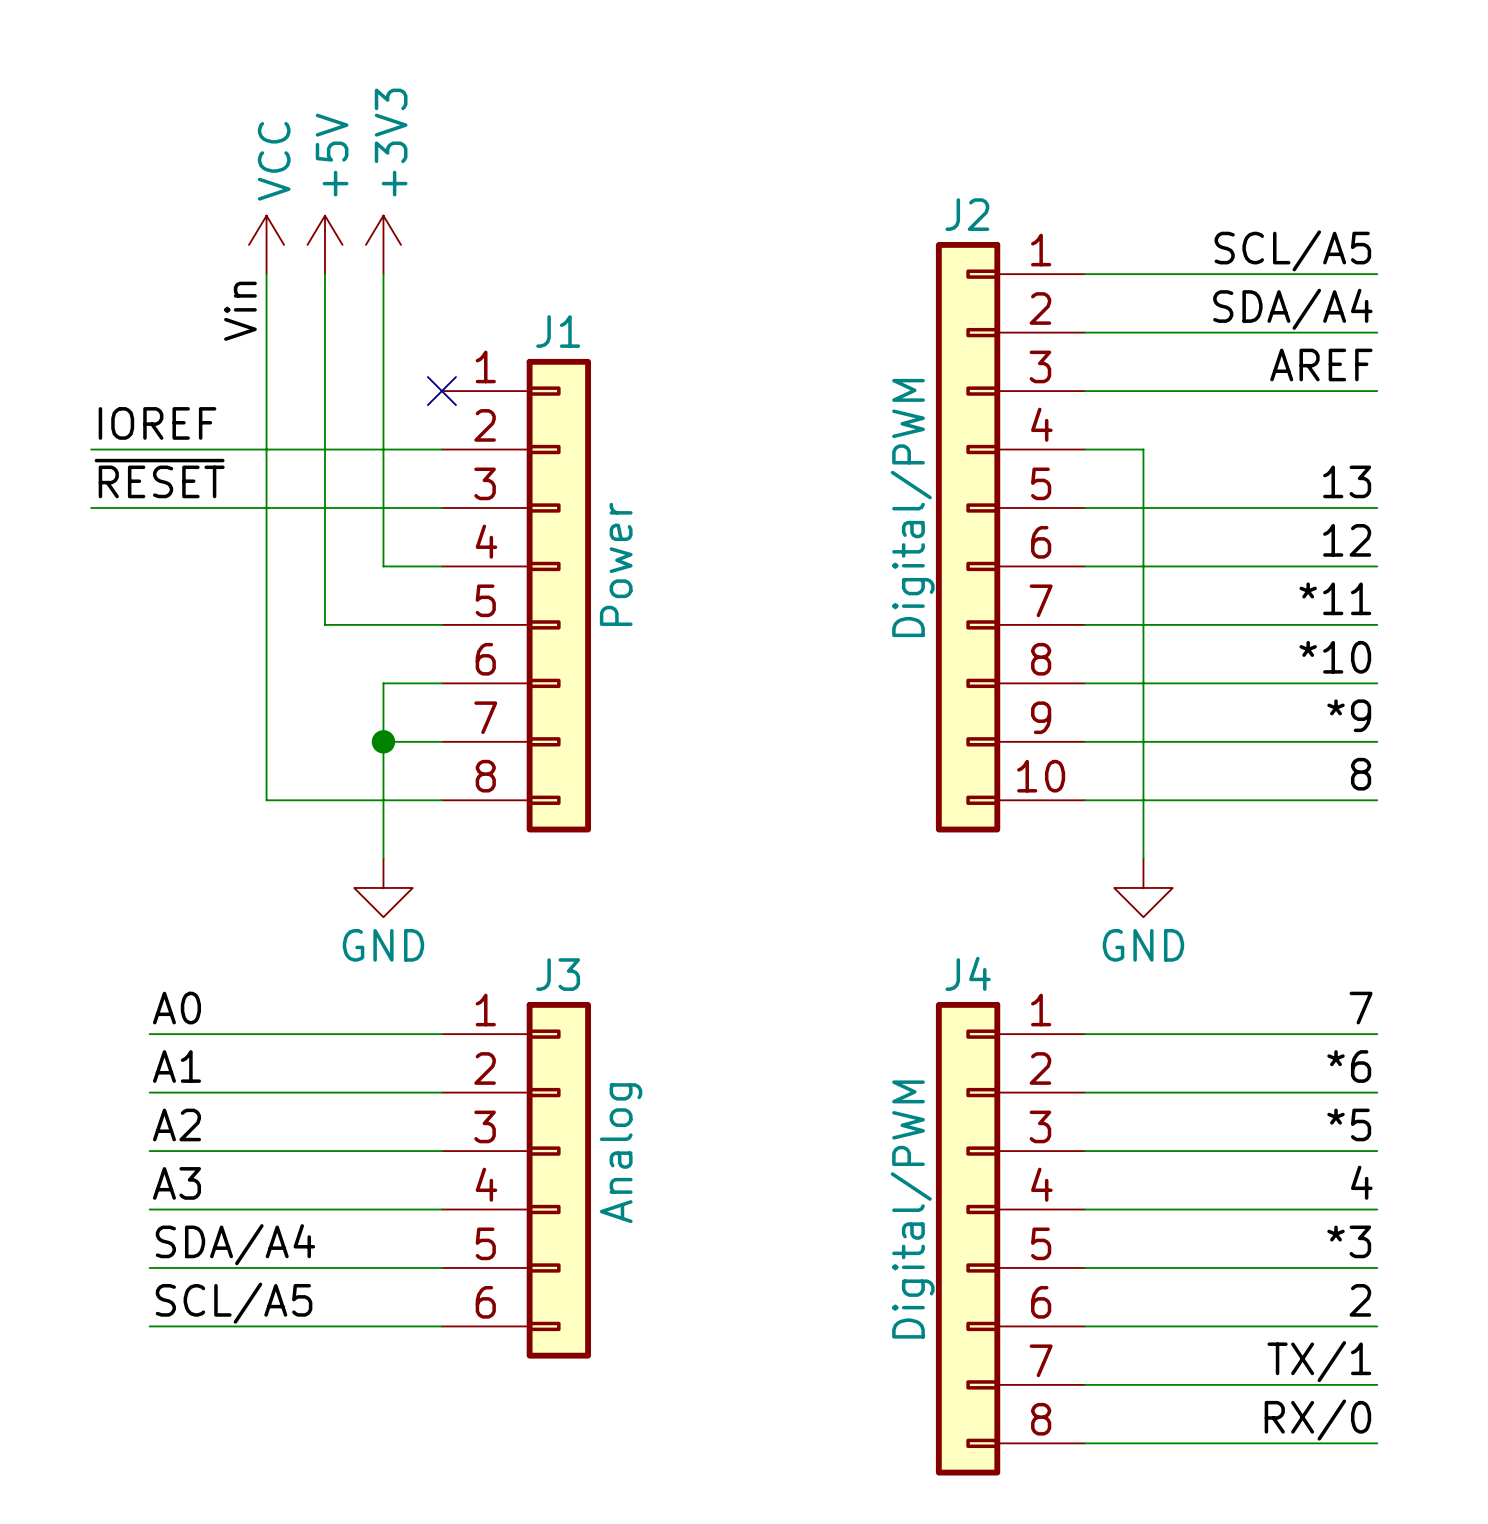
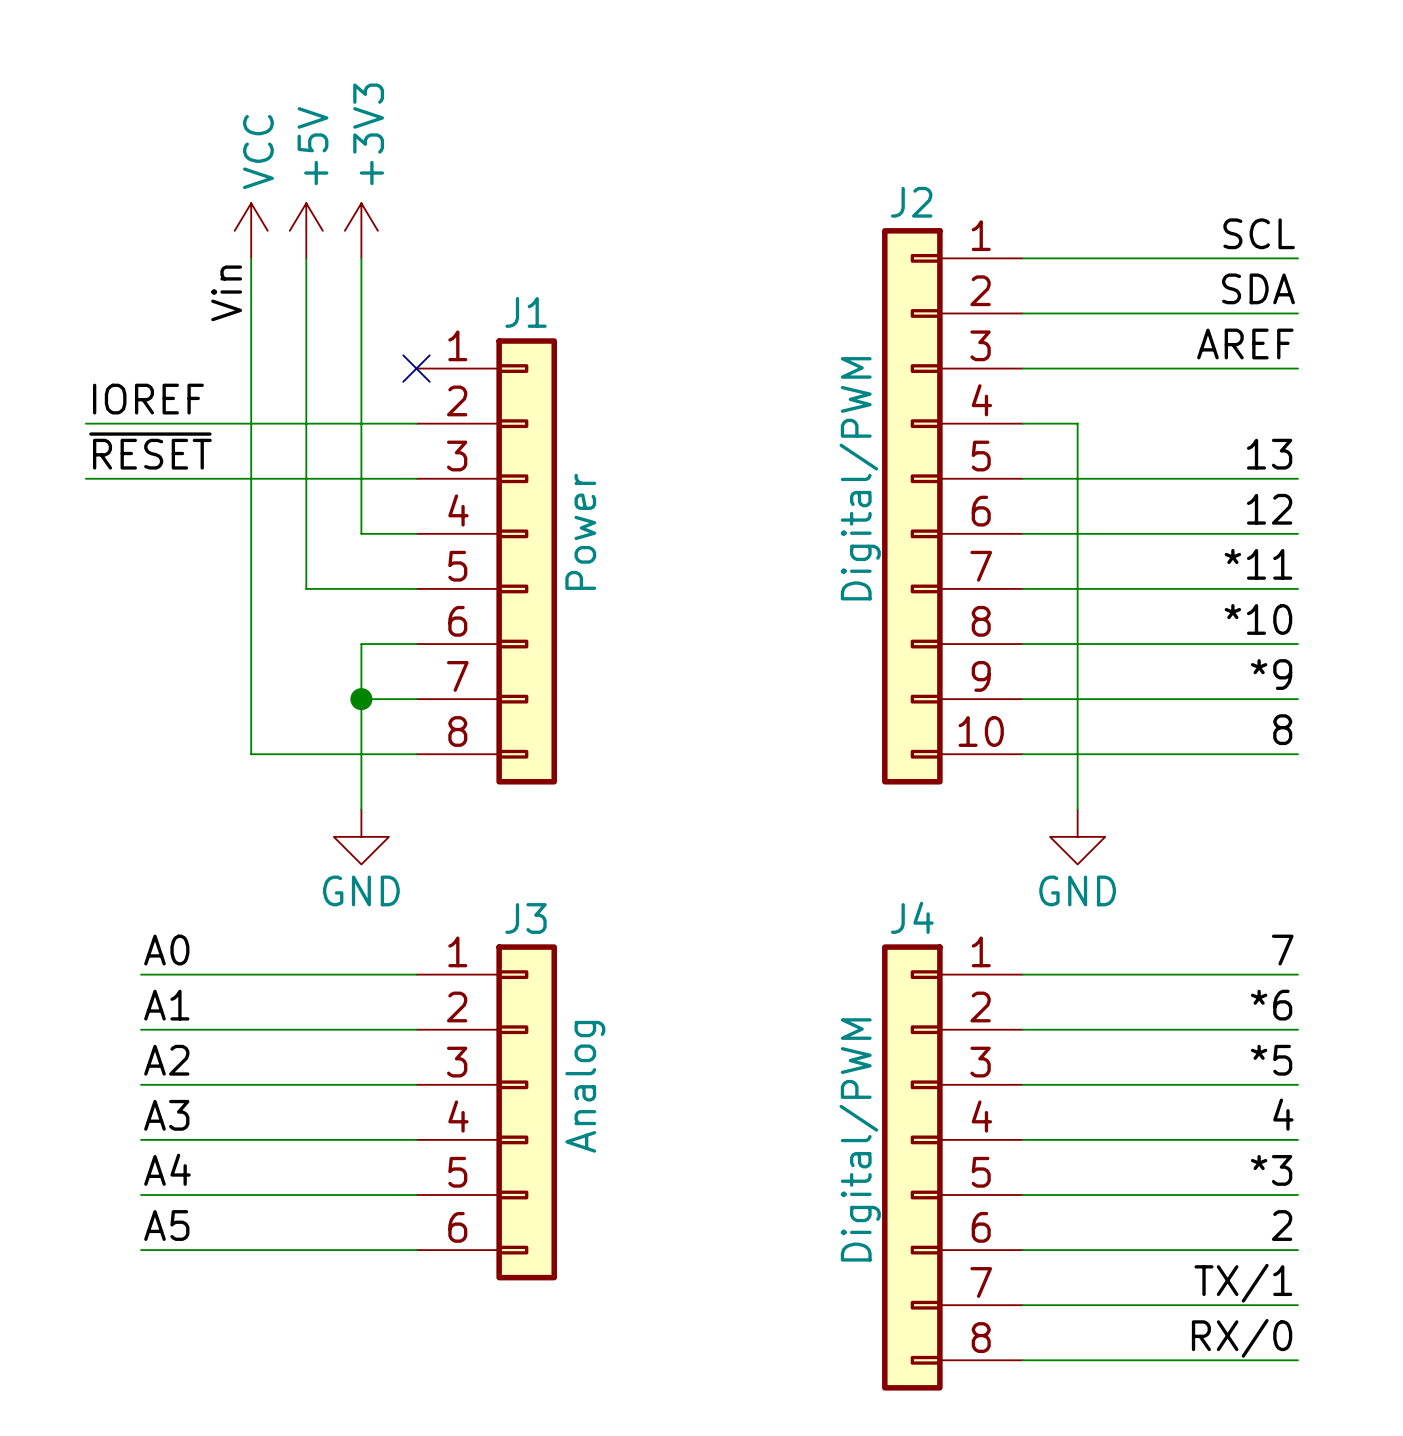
label: SCL/A5 (1292, 250) -> SCL (1259, 233)
label: SDA/A4 (1292, 309) -> SDA (1258, 288)
label: SDA/A4 (235, 1244) -> A4 (167, 1169)
label: SCL/A5 (234, 1303) -> A5 (166, 1225)

